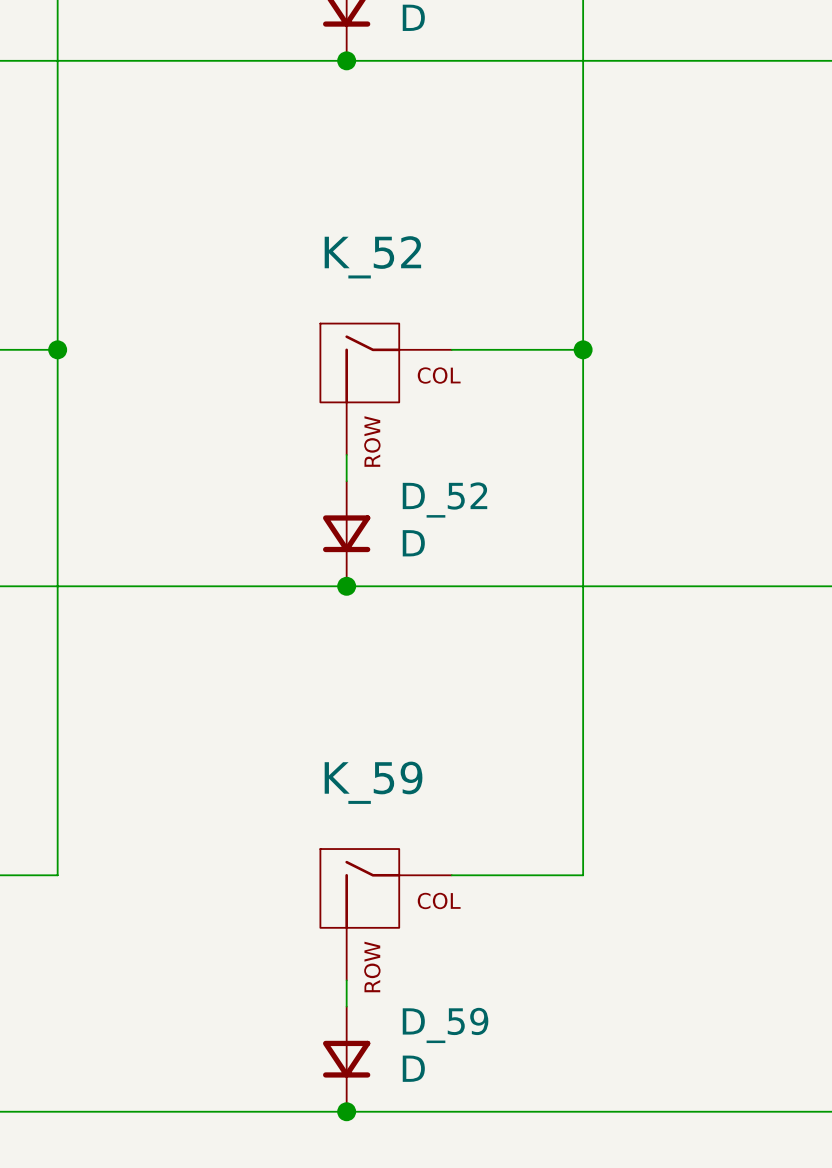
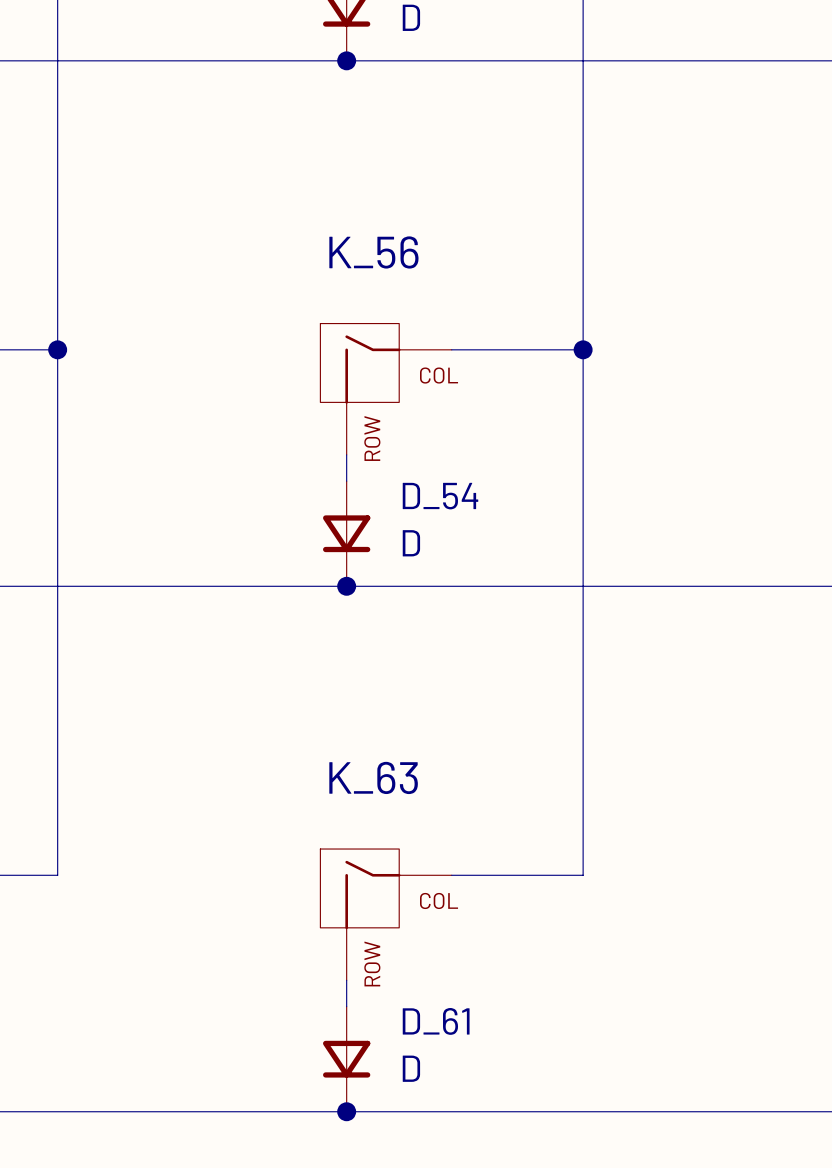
K_52 name: K_52 (372, 257) -> K_56 (373, 252)
D_52 name: D_52 (444, 499) -> D_54 (440, 496)
K_59 name: K_59 (373, 782) -> K_63 (373, 777)
D_59 name: D_59 (445, 1025) -> D_61 (436, 1021)

